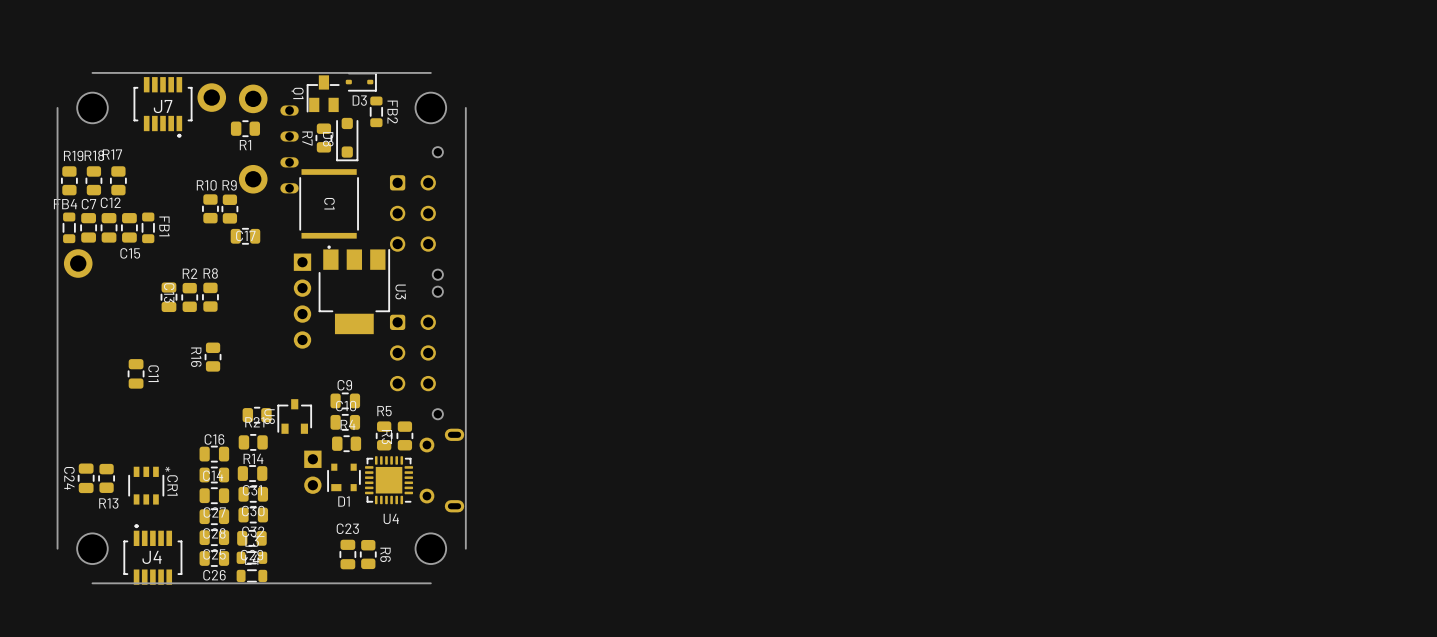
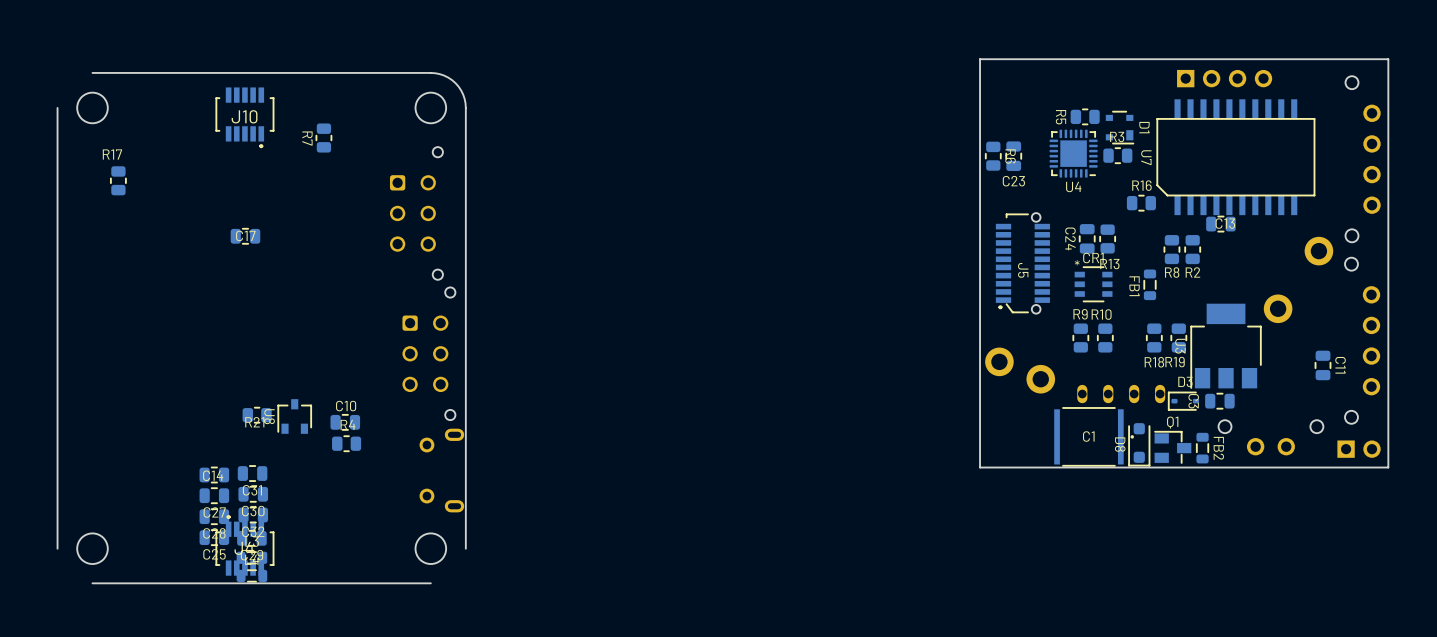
board edge: none -> (1388, 59) (980, 59) (980, 467) (1388, 467) (1388, 59)
board edge: none -> (430, 72) (444, 75) (455, 83) (463, 94) (465, 107)
part: none -> (1224, 78)
D3 rotation: 0° (361, 82) -> 180° (1183, 401)
D3 position: (361, 82) -> (1183, 401)
Q1 rotation: 0° (323, 93) -> 90° clockwise (1172, 447)
Q1 position: (323, 93) -> (1172, 447)
part: (211, 97) -> none
part: (253, 98) -> none
J7: (163, 107) -> none
FB2 position: (376, 111) -> (1202, 448)
J10: none -> (244, 117)
R1: (245, 128) -> none
D8 position: (347, 139) -> (1139, 444)
part: (289, 149) -> none
R19 name position: R19 (73, 155) -> R19 (1175, 362)
R18 name position: R18 (94, 155) -> R18 (1154, 362)
U7: none -> (1235, 157)
part: none -> (1363, 159)
part: (253, 179) -> none
R19 position: (69, 180) -> (1178, 338)
R18 position: (93, 180) -> (1154, 338)
R10 position: (210, 208) -> (1105, 338)
C1 rotation: 0° (329, 208) -> 90° counterclockwise (1094, 436)
C1 position: (329, 208) -> (1094, 436)
R9 position: (229, 209) -> (1080, 338)
FB1 name position: FB1 (164, 226) -> FB1 (1134, 286)
FB4: (69, 227) -> none
C7: (88, 227) -> none
C12: (109, 227) -> none
C15: (129, 227) -> none
FB1 position: (148, 227) -> (1149, 284)
part: none -> (1318, 251)
part: (78, 263) -> none
J5: none -> (1022, 263)
R2 name position: R2 (189, 273) -> R2 (1192, 272)
R8 name position: R8 (210, 273) -> R8 (1172, 272)
U3 rotation: 0° (354, 291) -> 180° (1226, 346)
U3 position: (354, 291) -> (1226, 346)
C13 rotation: 0° (168, 297) -> 90° clockwise (1220, 224)
C13 position: (168, 297) -> (1220, 224)
R2 position: (189, 297) -> (1192, 249)
R8 position: (210, 297) -> (1171, 249)
part: (302, 301) -> none
part: none -> (1278, 308)
part: none -> (1362, 340)
part position: (416, 352) -> (428, 353)
R16 rotation: 0° (213, 357) -> 90° clockwise (1141, 203)
R16 position: (213, 357) -> (1141, 203)
part: none -> (999, 361)
C11 position: (136, 373) -> (1323, 365)
part: none -> (1040, 379)
part: none -> (1121, 394)
C9: (345, 400) -> none
C3: none -> (1219, 401)
R5 name position: R5 (384, 411) -> R5 (1061, 117)
R5 rotation: 0° (384, 435) -> 90° clockwise (1085, 116)
R5 position: (384, 435) -> (1085, 116)
R3 rotation: 0° (404, 435) -> 90° clockwise (1117, 155)
R3 position: (404, 435) -> (1117, 155)
part: none -> (1270, 437)
R14: (253, 442) -> none
part: none -> (1359, 449)
C16: (214, 454) -> none
part: (312, 472) -> none
D1 rotation: 0° (343, 477) -> 90° counterclockwise (1119, 127)
D1 position: (343, 477) -> (1119, 127)
C24 position: (86, 478) -> (1087, 238)
R13 position: (106, 478) -> (1107, 238)
U4 position: (389, 480) -> (1073, 153)
CR1 rotation: 0° (146, 485) -> 90° counterclockwise (1093, 284)
CR1 position: (146, 485) -> (1093, 284)
U4 name position: U4 (391, 518) -> U4 (1073, 186)
C23 name position: C23 (347, 528) -> C23 (1013, 181)
J4 position: (152, 554) -> (244, 545)
C23 position: (347, 554) -> (1013, 156)
R6 position: (368, 554) -> (993, 156)
C26: (214, 558) -> none

